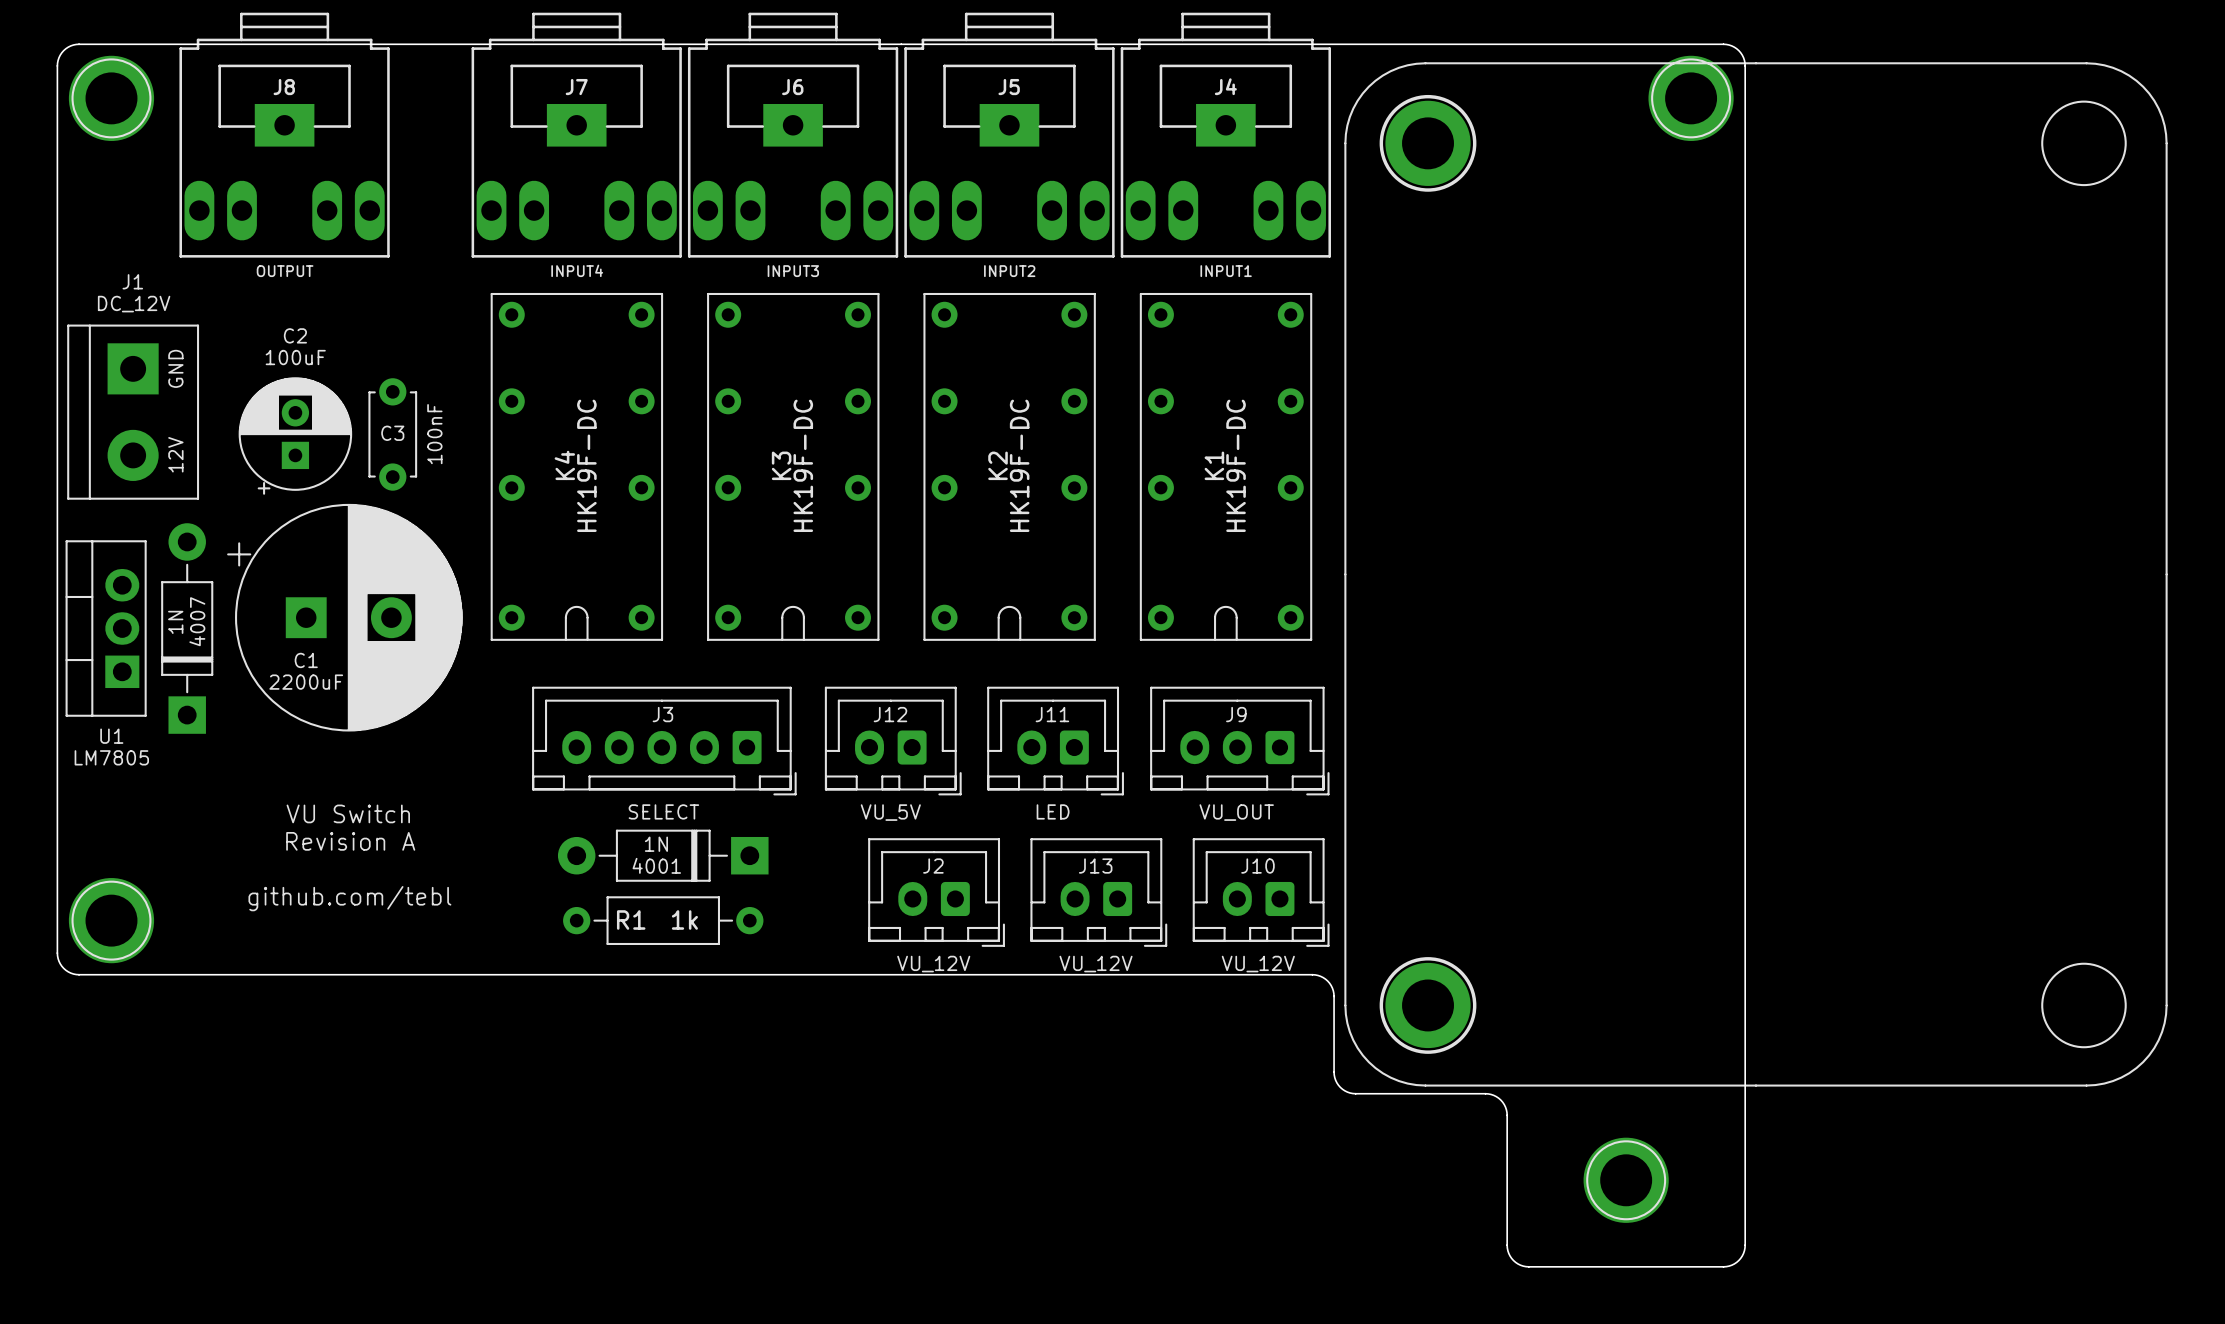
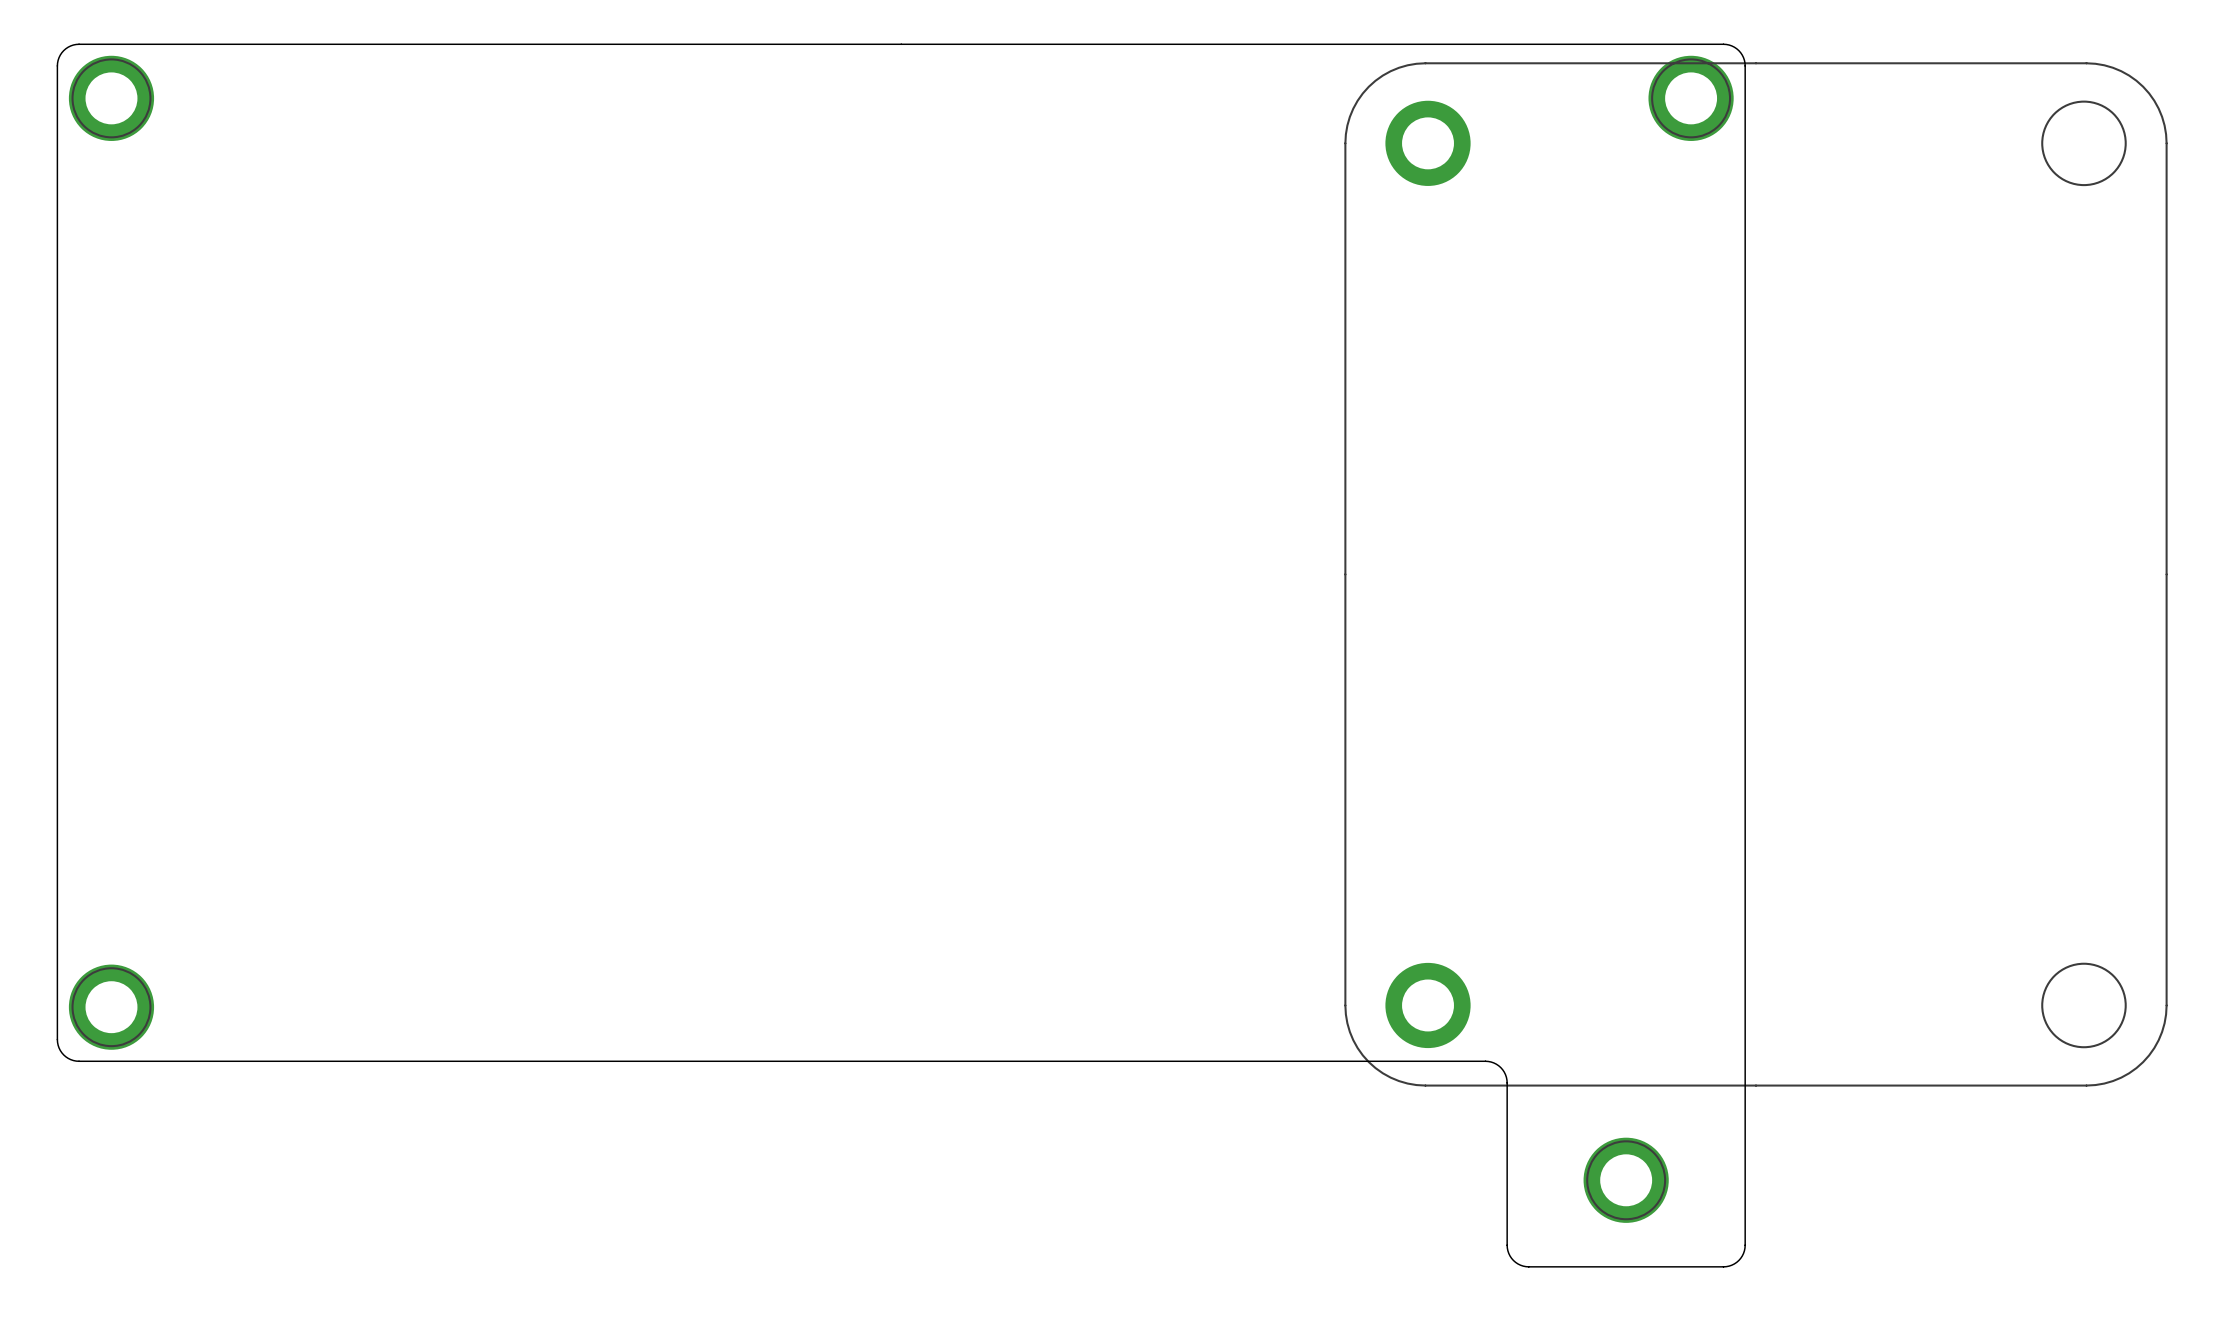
drawing: [1379, 94, 1477, 192] -> none
J8: OUTPUT (284, 135) -> none
J7: INPUT4 (576, 135) -> none
J6: INPUT3 (793, 135) -> none
J5: INPUT2 (1009, 135) -> none
J4: INPUT1 (1225, 135) -> none
text: GND (175, 368) -> none
J1: DC_12V (133, 412) -> none
C3: 100nF (392, 434) -> none
C2: 100uF (295, 436) -> none
text: 12V (175, 454) -> none
K4: HK19F-DC (576, 466) -> none
K3: HK19F-DC (793, 466) -> none
K2: HK19F-DC (1009, 466) -> none
K1: HK19F-DC (1226, 466) -> none
C1: 2200uF (344, 617) -> none
text: 4007 (197, 621) -> none
text: 1N (175, 622) -> none
U1: (106, 628) -> none
part: (187, 628) -> none
J3: SELECT (664, 741) -> none
J12: VU_5V (893, 741) -> none
J11: LED (1055, 741) -> none
J9: VU_OUT (1239, 741) -> none
text: LM7805 (111, 757) -> none
text: VU Switch (348, 813) -> none
text: Revision A (350, 841) -> none
text: 1N (656, 844) -> none
part: (663, 855) -> none
text: 4001 (656, 865) -> none
J2: VU_12V (936, 892) -> none
J13: VU_12V (1098, 892) -> none
J10: VU_12V (1261, 892) -> none
text: github.com/tebl (349, 898) -> none
part position: (111, 920) -> (111, 1007)
R1: 1k (663, 920) -> none
board edge: (57, 953) (59, 961) (63, 968) (70, 973) (79, 974) (1315, 974) (1325, 979) (1333, 990) (1334, 1074) (1336, 1082) (1342, 1089) (1355, 1093) (1488, 1093) (1496, 1096) (1502, 1102) (1507, 1115) -> (57, 953) (57, 1042) (63, 1054) (76, 1061) (1485, 1061) (1496, 1064) (1505, 1074) (1507, 1115)
drawing: [1379, 957, 1477, 1054] -> none

